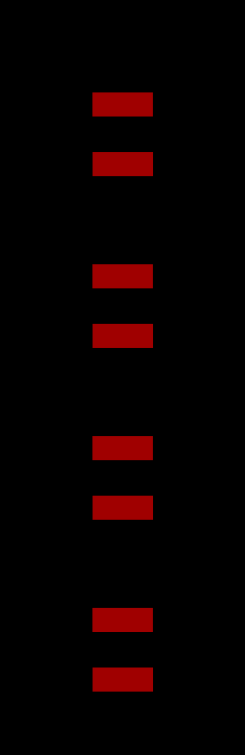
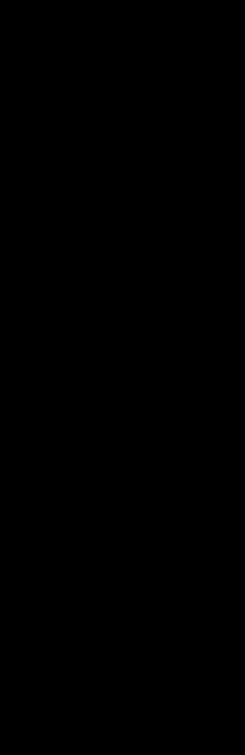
part: (122, 134) -> none
part: (122, 306) -> none
part: (122, 477) -> none
part: (122, 649) -> none

